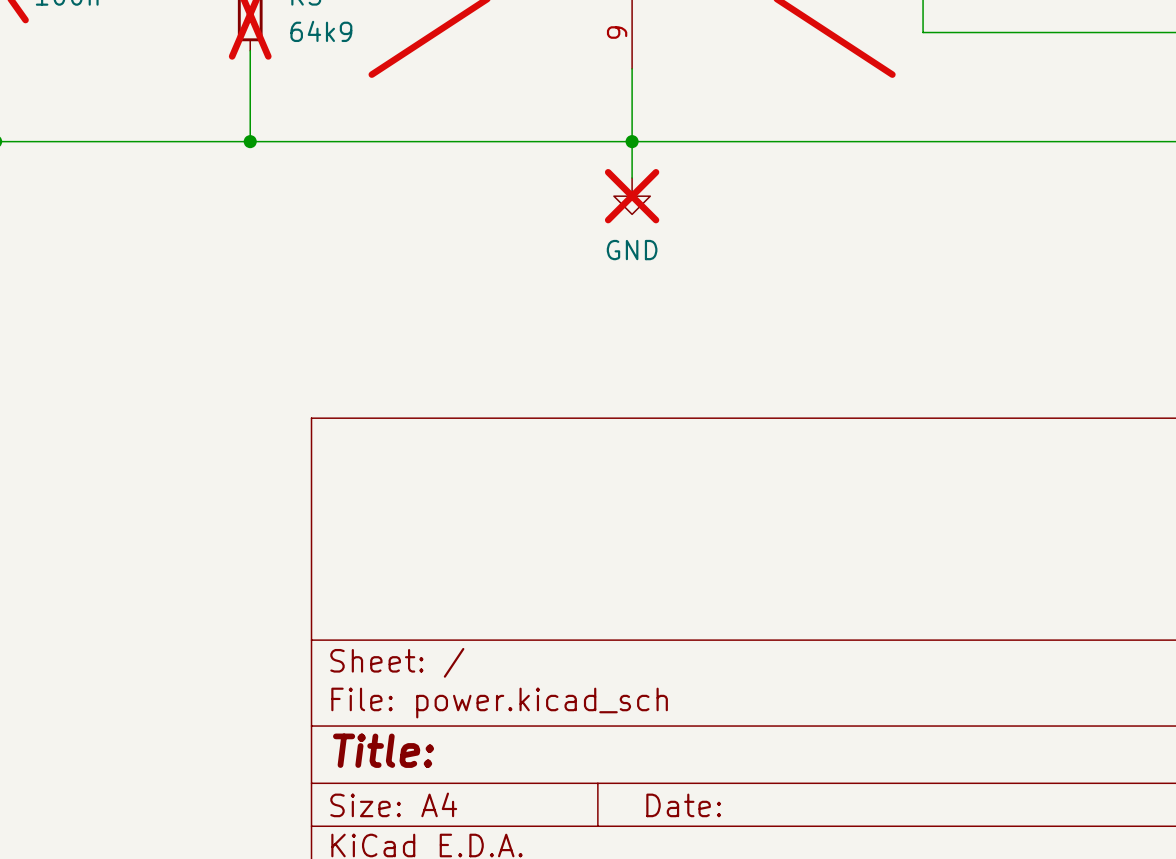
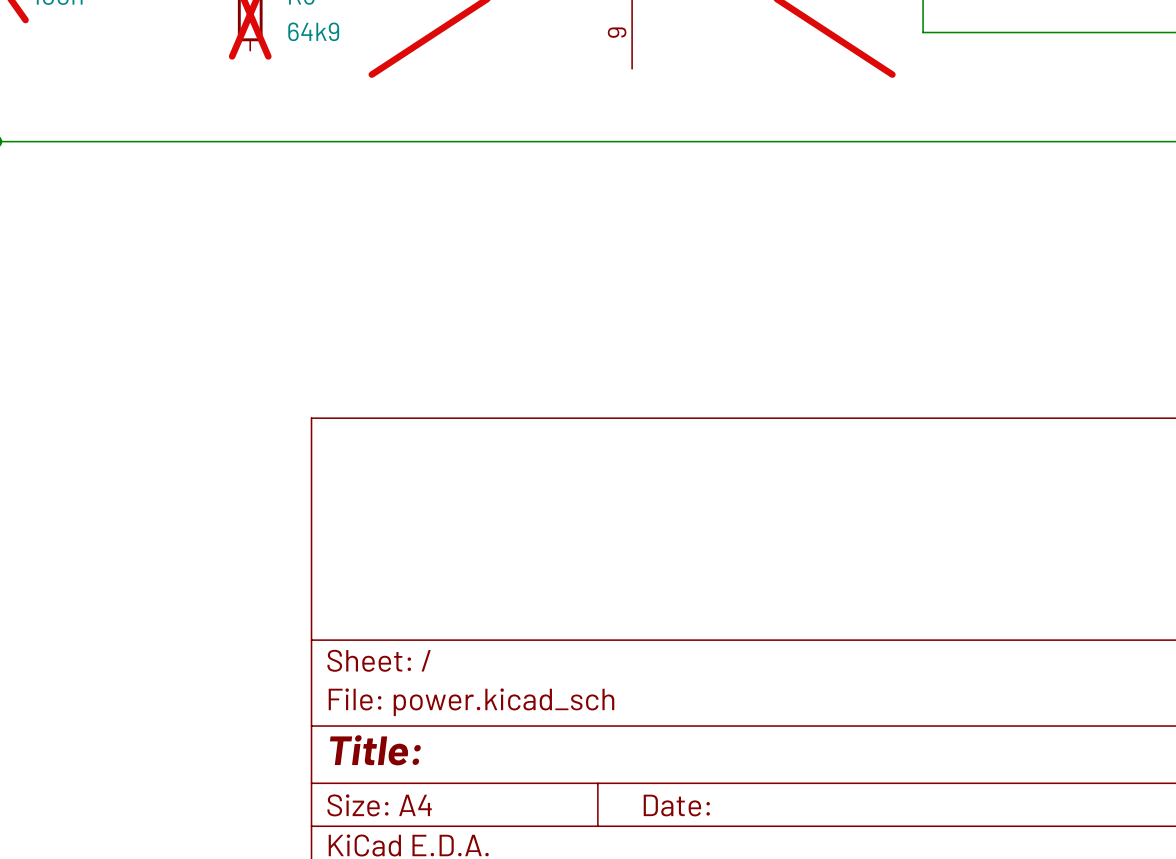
wire: (250, 50) (250, 141) -> none
wire: (632, 68) (632, 177) -> none
junction: (250, 141) -> none
junction: (632, 141) -> none
power symbol: GND (632, 196) -> none

